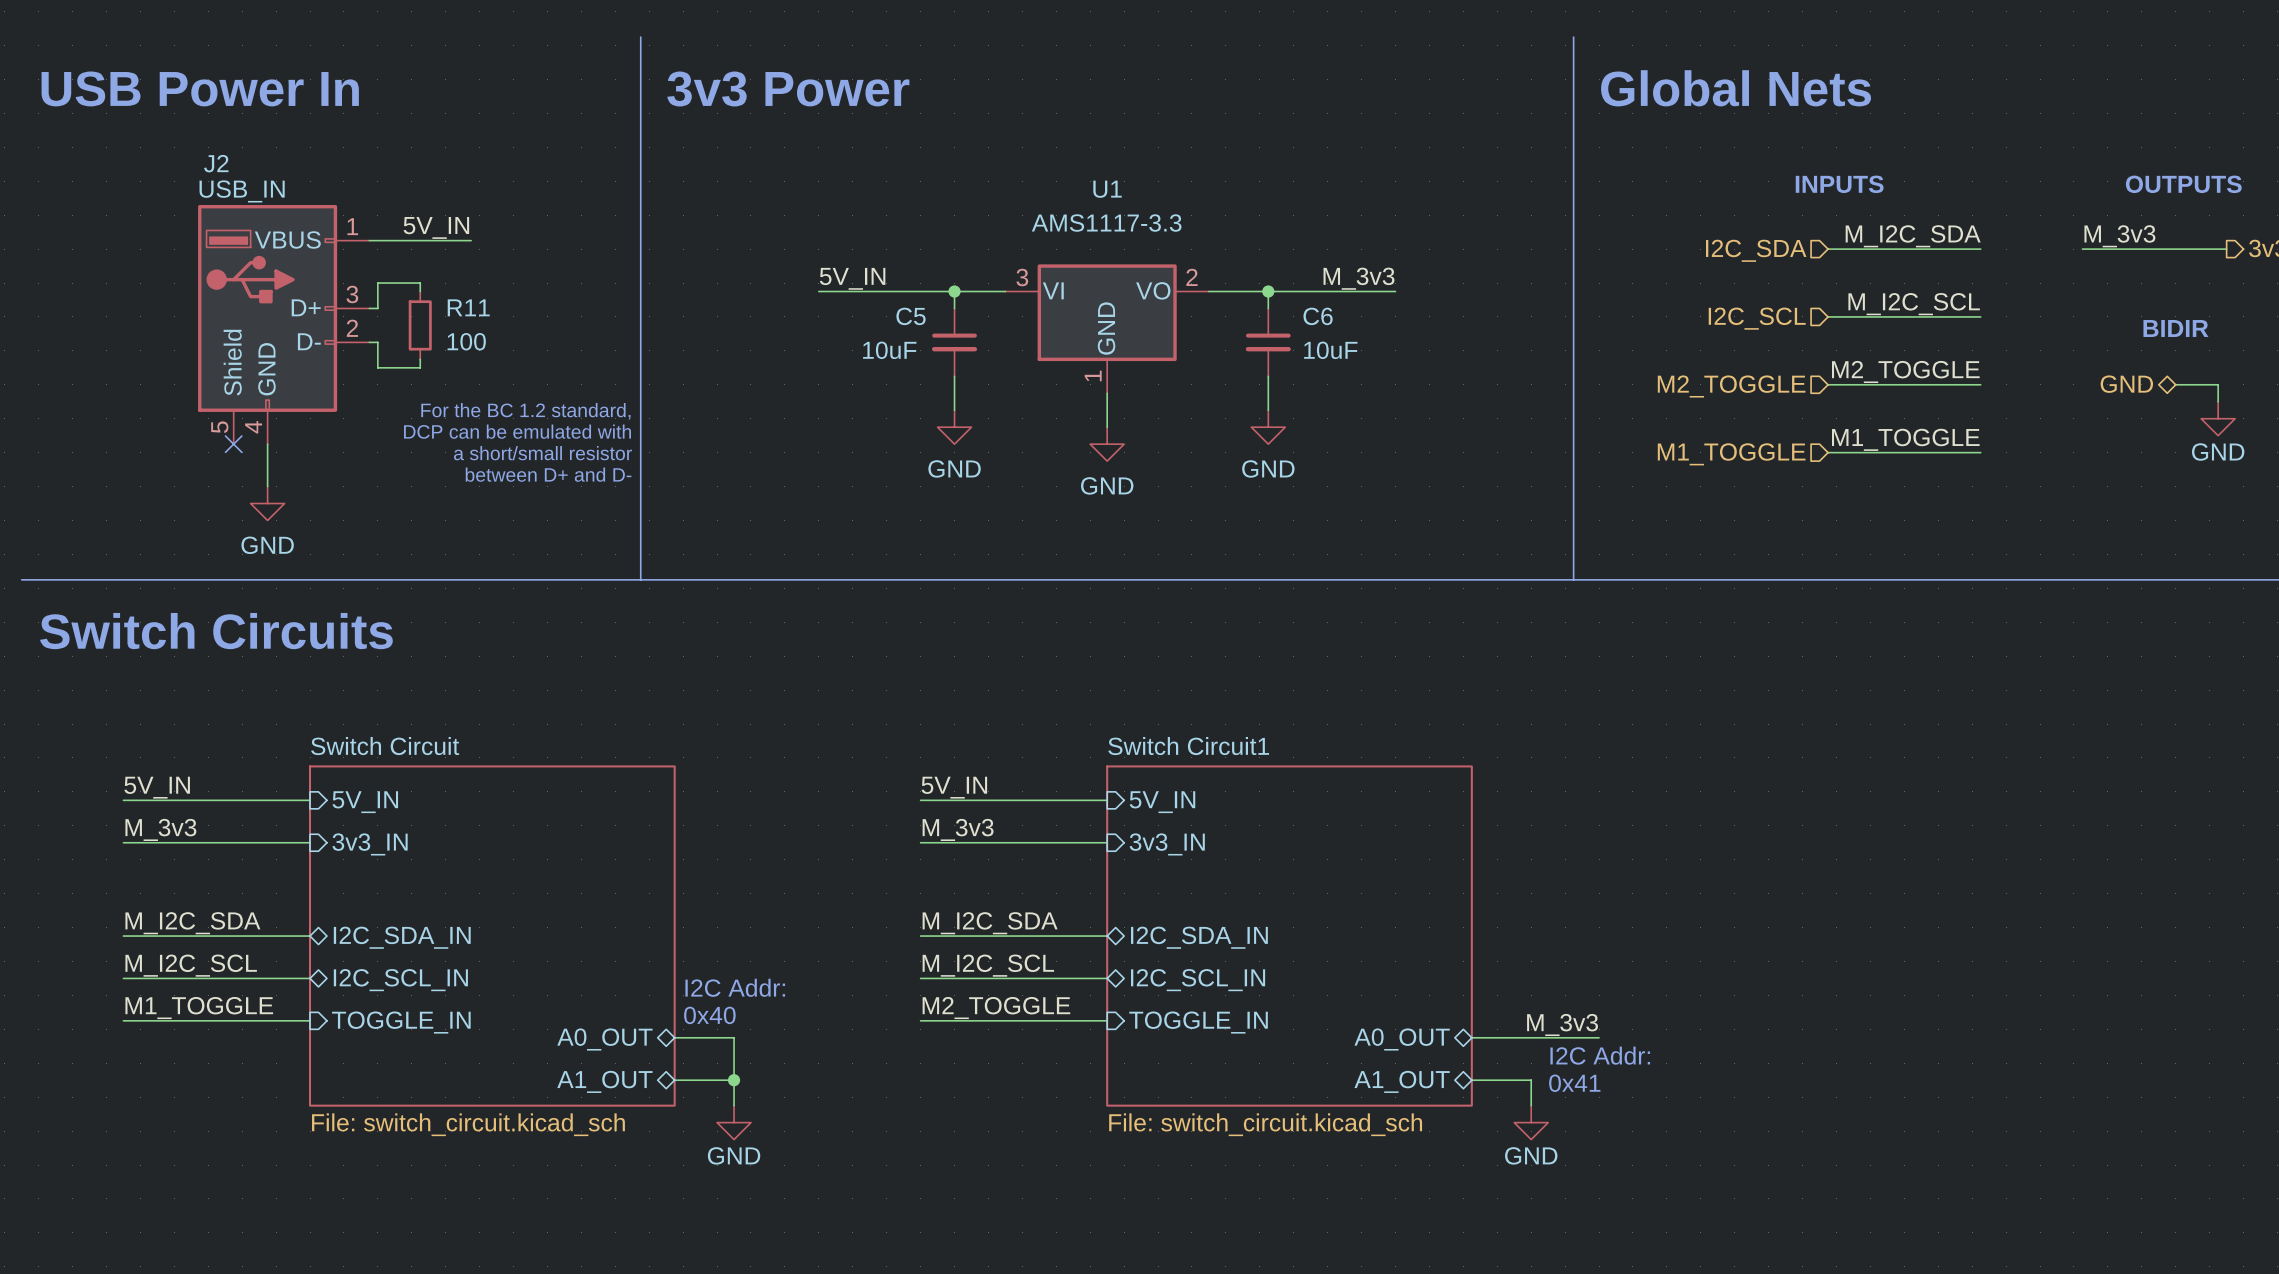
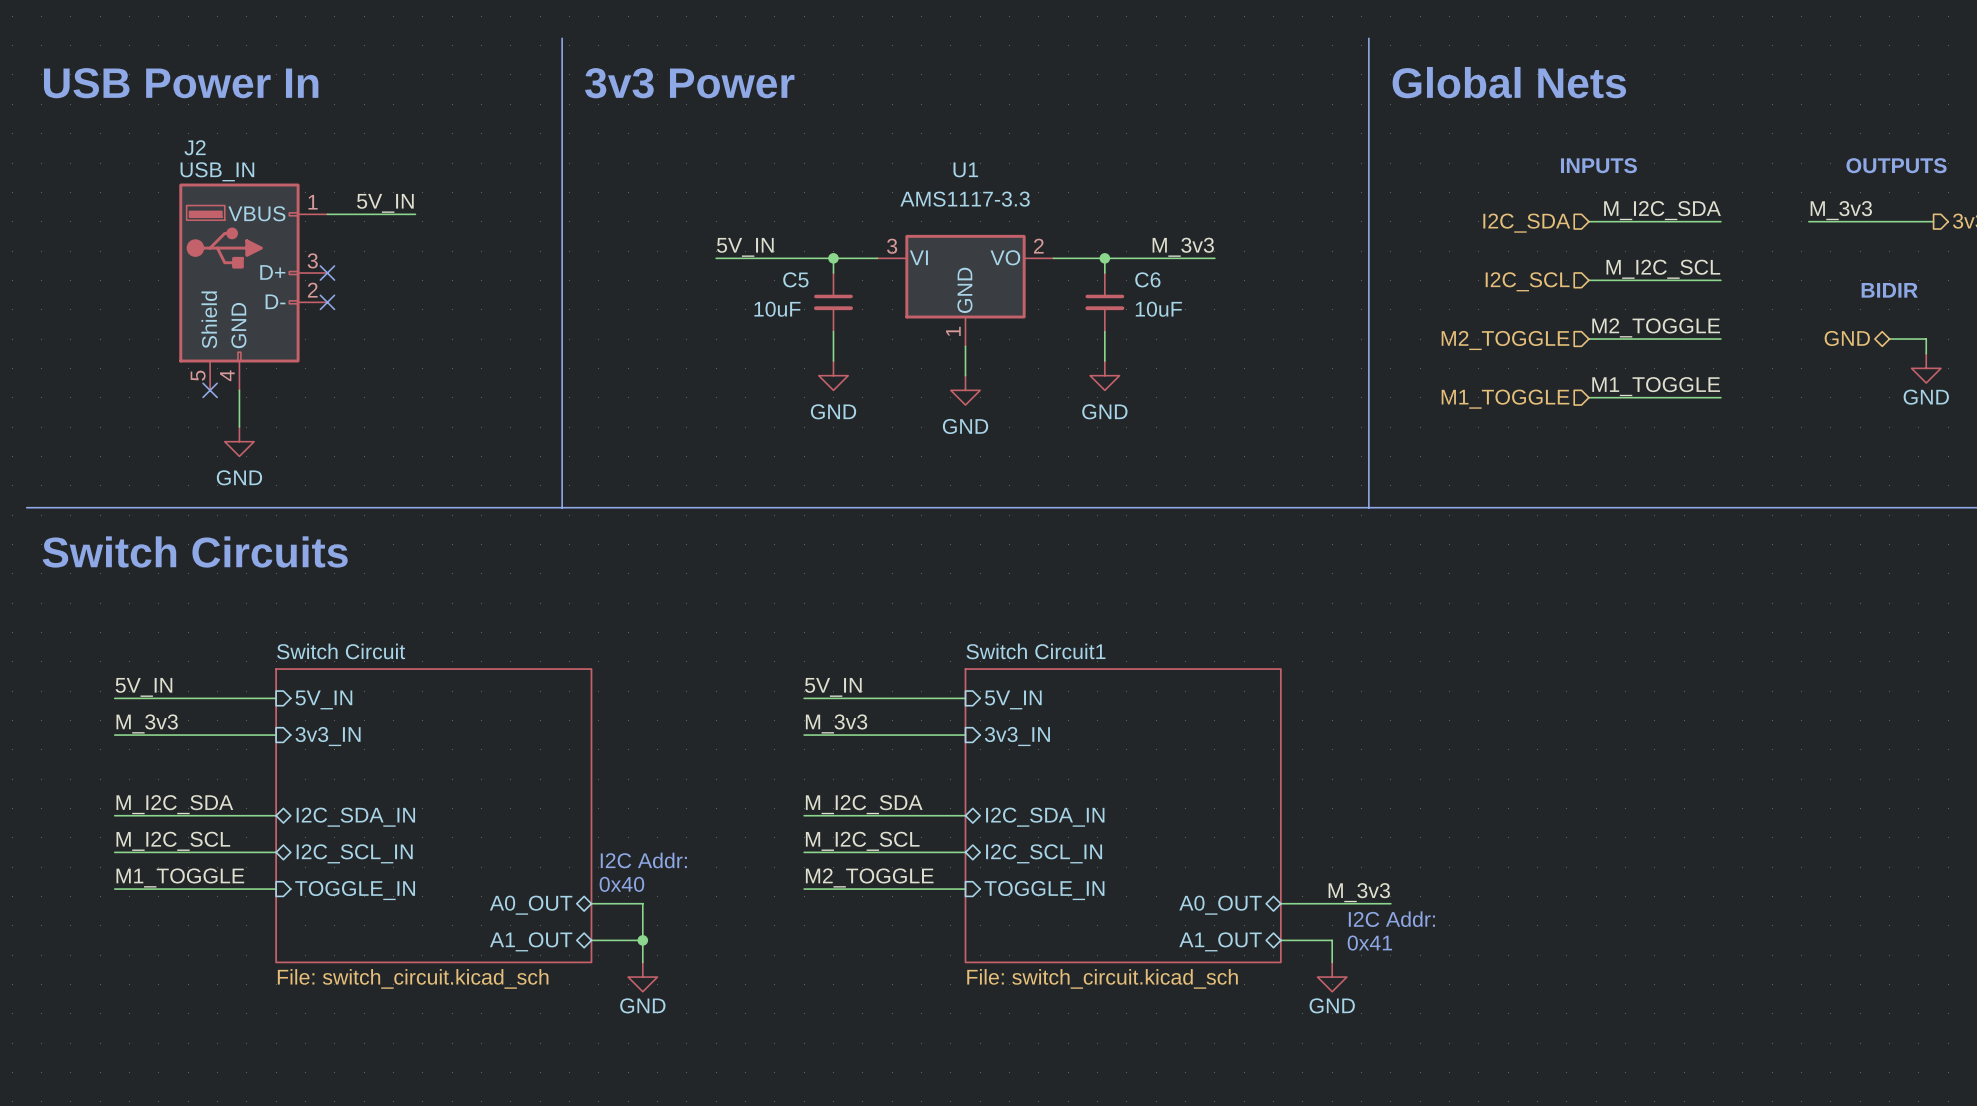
wire: (420, 291) (420, 283) (377, 283) (377, 308) (369, 308) -> none
no-connect mark: none -> (327, 273)
R11: 100 (420, 325) -> none
wire: (369, 342) (377, 342) (377, 367) (420, 367) (420, 359) -> none
no-connect mark: none -> (327, 302)
text: For the BC 1.2 standard, (525, 411) -> none
text: DCP can be emulated with (517, 431) -> none
text: a short/small resistor (542, 453) -> none
text: between D+ and D- (548, 474) -> none

